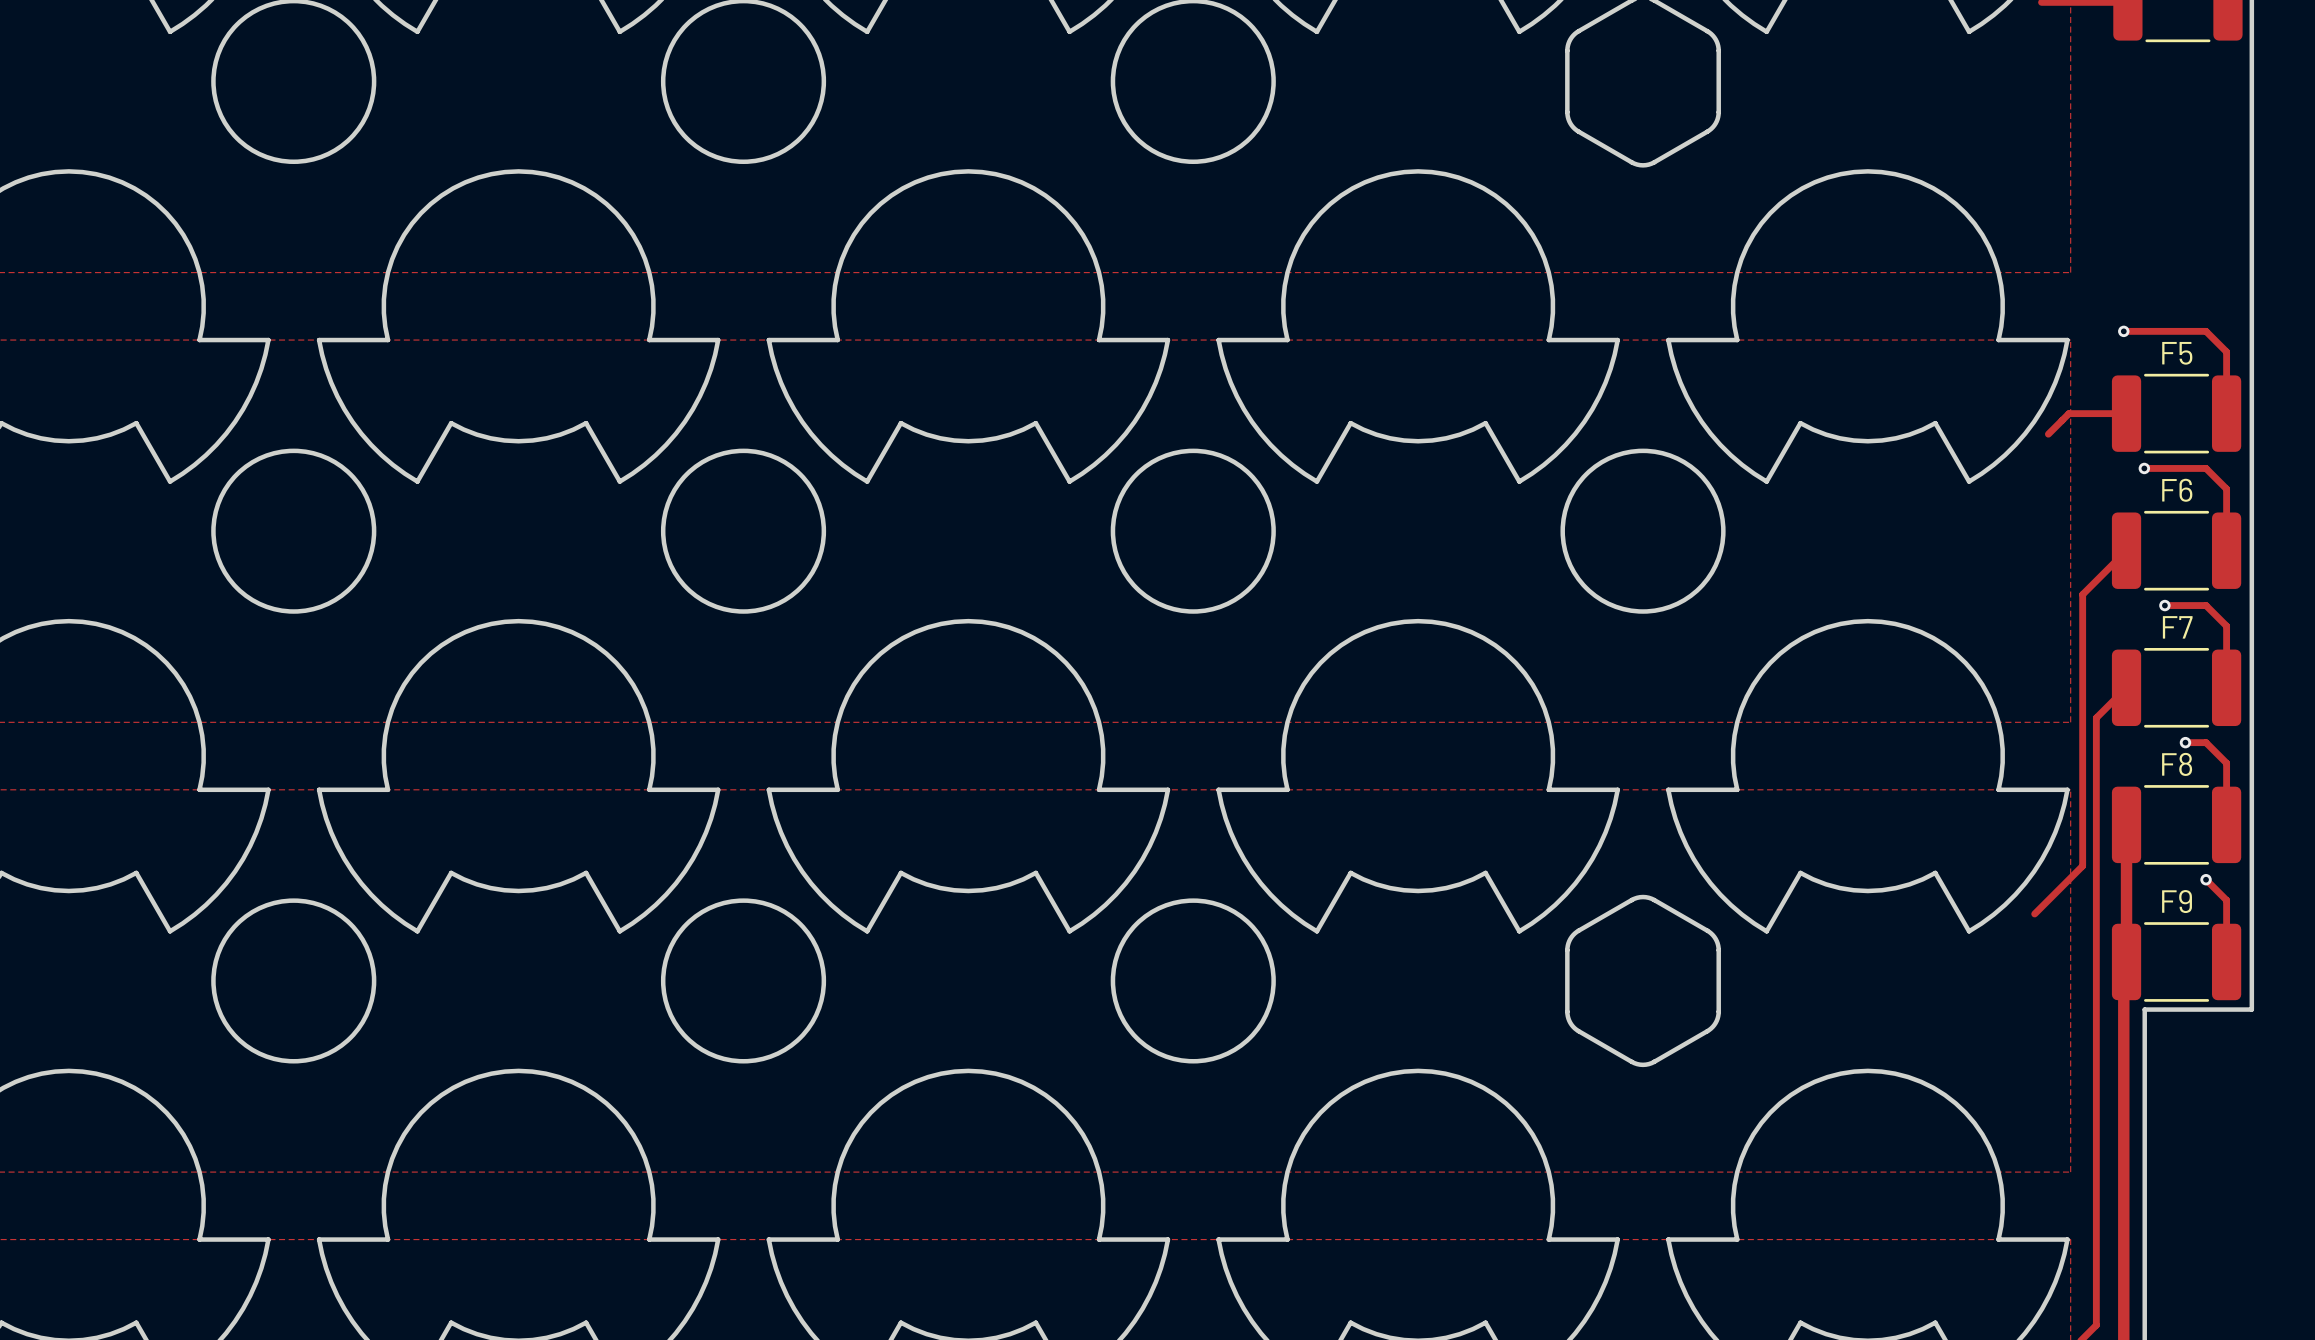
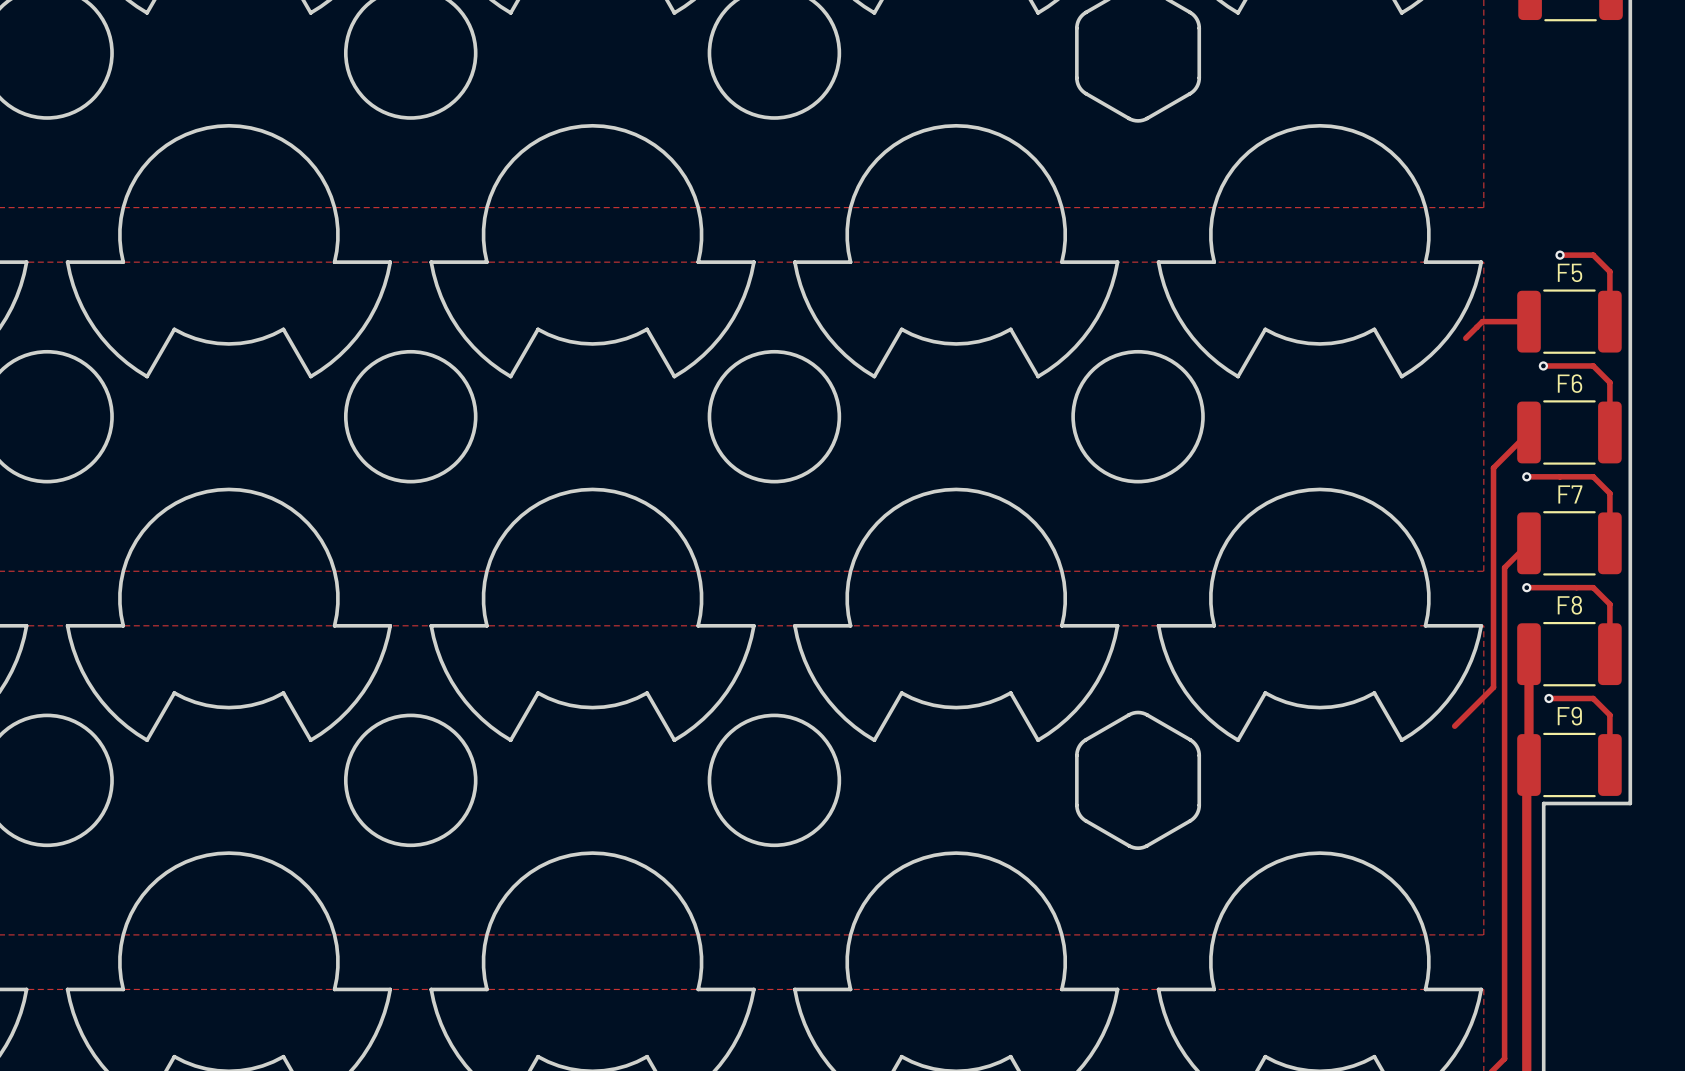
track: (2123, 331) (2164, 331) -> (1526, 476) (1560, 476)
via position: (2123, 331) -> (1560, 255)
via position: (2164, 605) -> (1526, 476)
track: none -> (1526, 587) (1576, 587)
via position: (2185, 742) -> (1526, 587)
track: none -> (1548, 698) (1593, 698)
via position: (2206, 879) -> (1548, 698)

